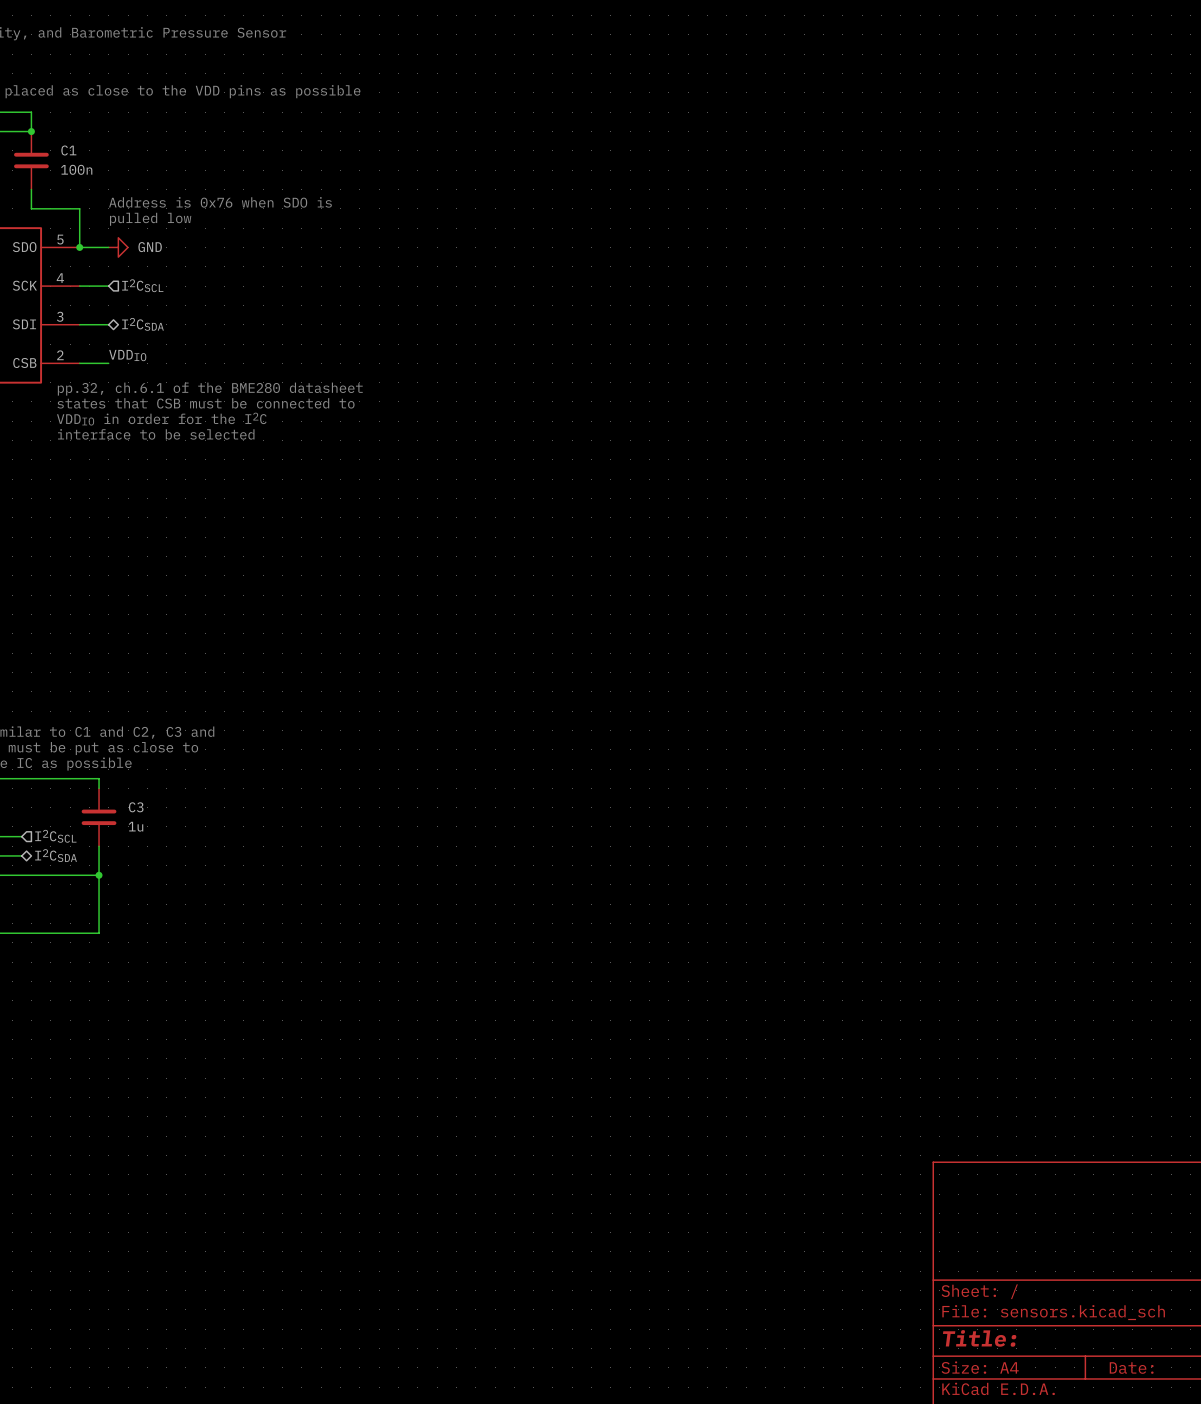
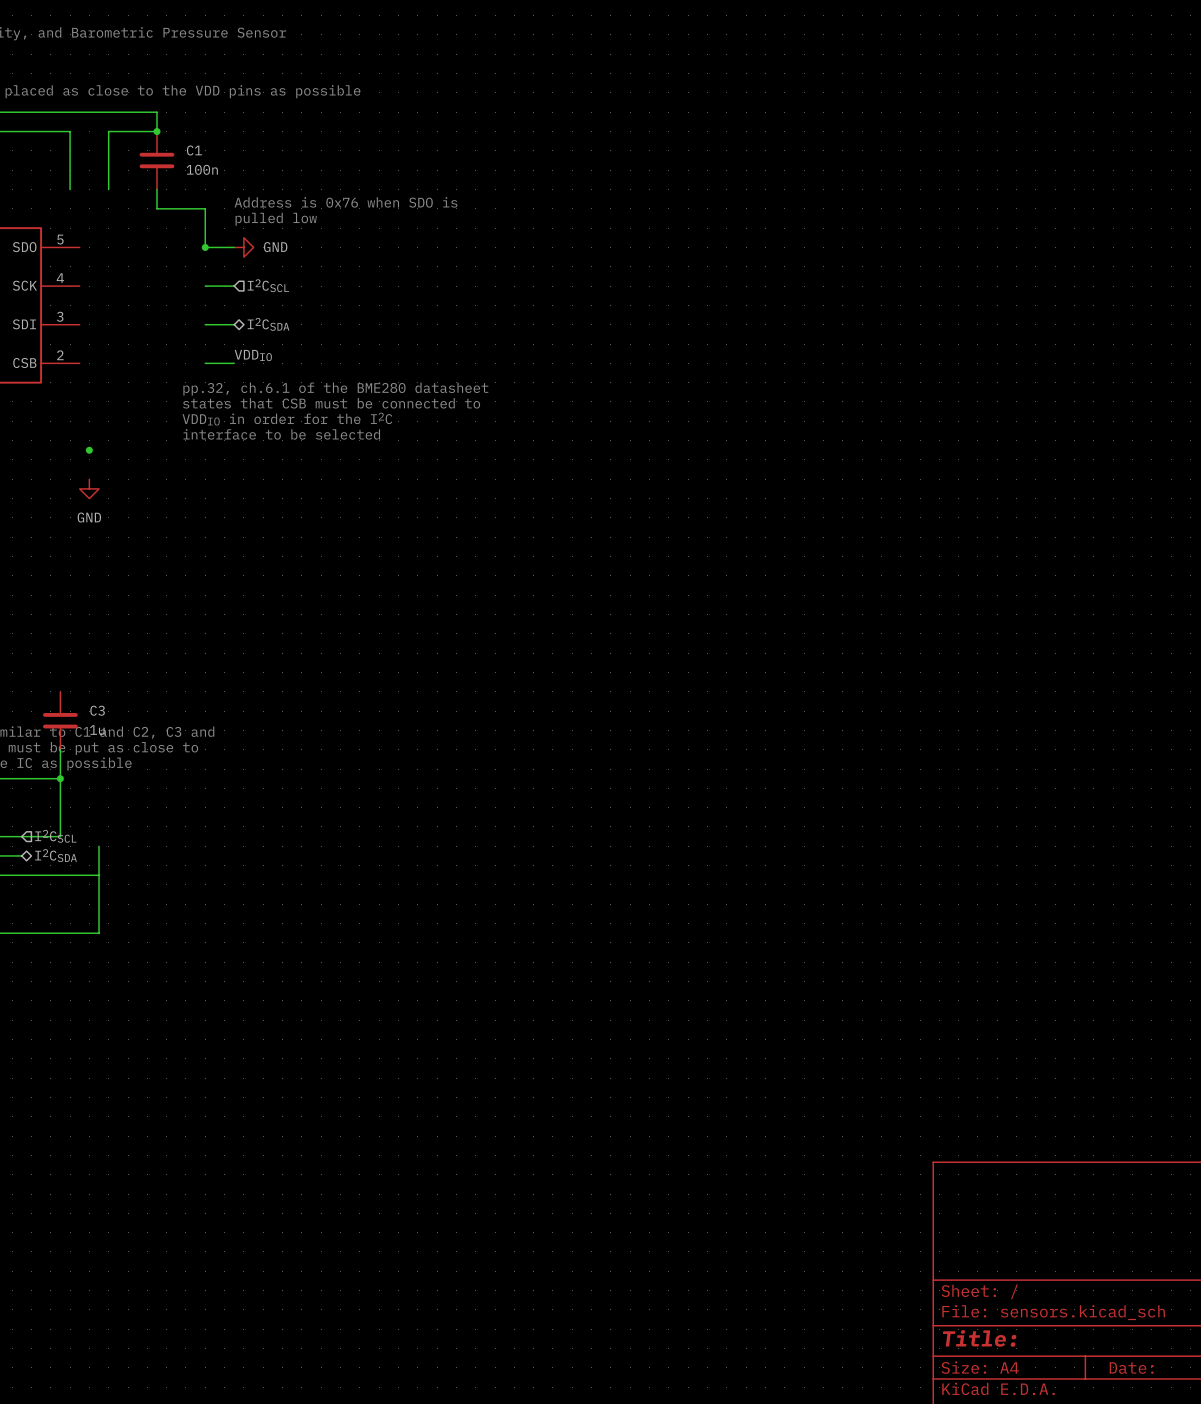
wire: (31, 112) (31, 131) -> (70, 189) (70, 131) (31, 131)
wire: none -> (31, 112) (156, 112) (156, 131) (108, 131) (108, 189)
junction: (31, 131) -> none
junction: none -> (156, 131)
C1 position: (31, 160) -> (156, 160)
wire: (31, 189) (31, 208) (79, 208) (79, 247) (108, 247) -> (156, 189) (156, 208) (205, 208) (205, 247) (234, 247)
text position: Address is 0x76 when SDO is (220, 202) -> Address is 0x76 when SDO is (346, 202)
text position: pulled low (150, 219) -> pulled low (276, 219)
junction: (79, 247) -> none
power symbol: GND (118, 247) -> none
junction: none -> (205, 247)
power symbol: none -> GND (243, 247)
hierarchical label position: I2CSCL (142, 285) -> I2CSCL (268, 285)
wire: (79, 286) (108, 286) -> (205, 286) (234, 286)
wire: (79, 324) (108, 324) -> (205, 324) (234, 324)
hierarchical label position: I2CSDA (142, 324) -> I2CSDA (268, 324)
label position: VDDIO (127, 355) -> VDDIO (253, 355)
wire: (79, 363) (108, 363) -> (205, 363) (234, 363)
text position: pp.32, ch.6.1 of the BME280 datasheet (210, 389) -> pp.32, ch.6.1 of the BME280 datasheet (335, 389)
text position: states that CSB must be connected to (205, 403) -> states that CSB must be connected to (331, 403)
text position: VDDIO in order for the I2C (161, 419) -> VDDIO in order for the I2C (287, 419)
text position: interface to be selected (156, 434) -> interface to be selected (281, 434)
junction: none -> (89, 450)
power symbol: none -> GND (89, 488)
wire: none -> (60, 749) (60, 836) (21, 836)
wire: (60, 778) (99, 778) (99, 788) -> none
junction: none -> (60, 778)
C3 position: (99, 817) -> (60, 720)
junction: (99, 875) -> none

